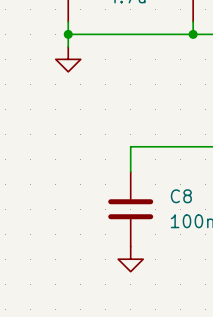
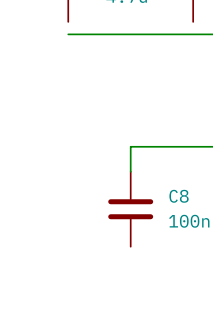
wire: (68, 21) (68, 46) -> none
wire: (193, 21) (193, 34) -> none
junction: (68, 34) -> none
junction: (193, 34) -> none
power symbol: (68, 59) -> none
power symbol: (130, 259) -> none

